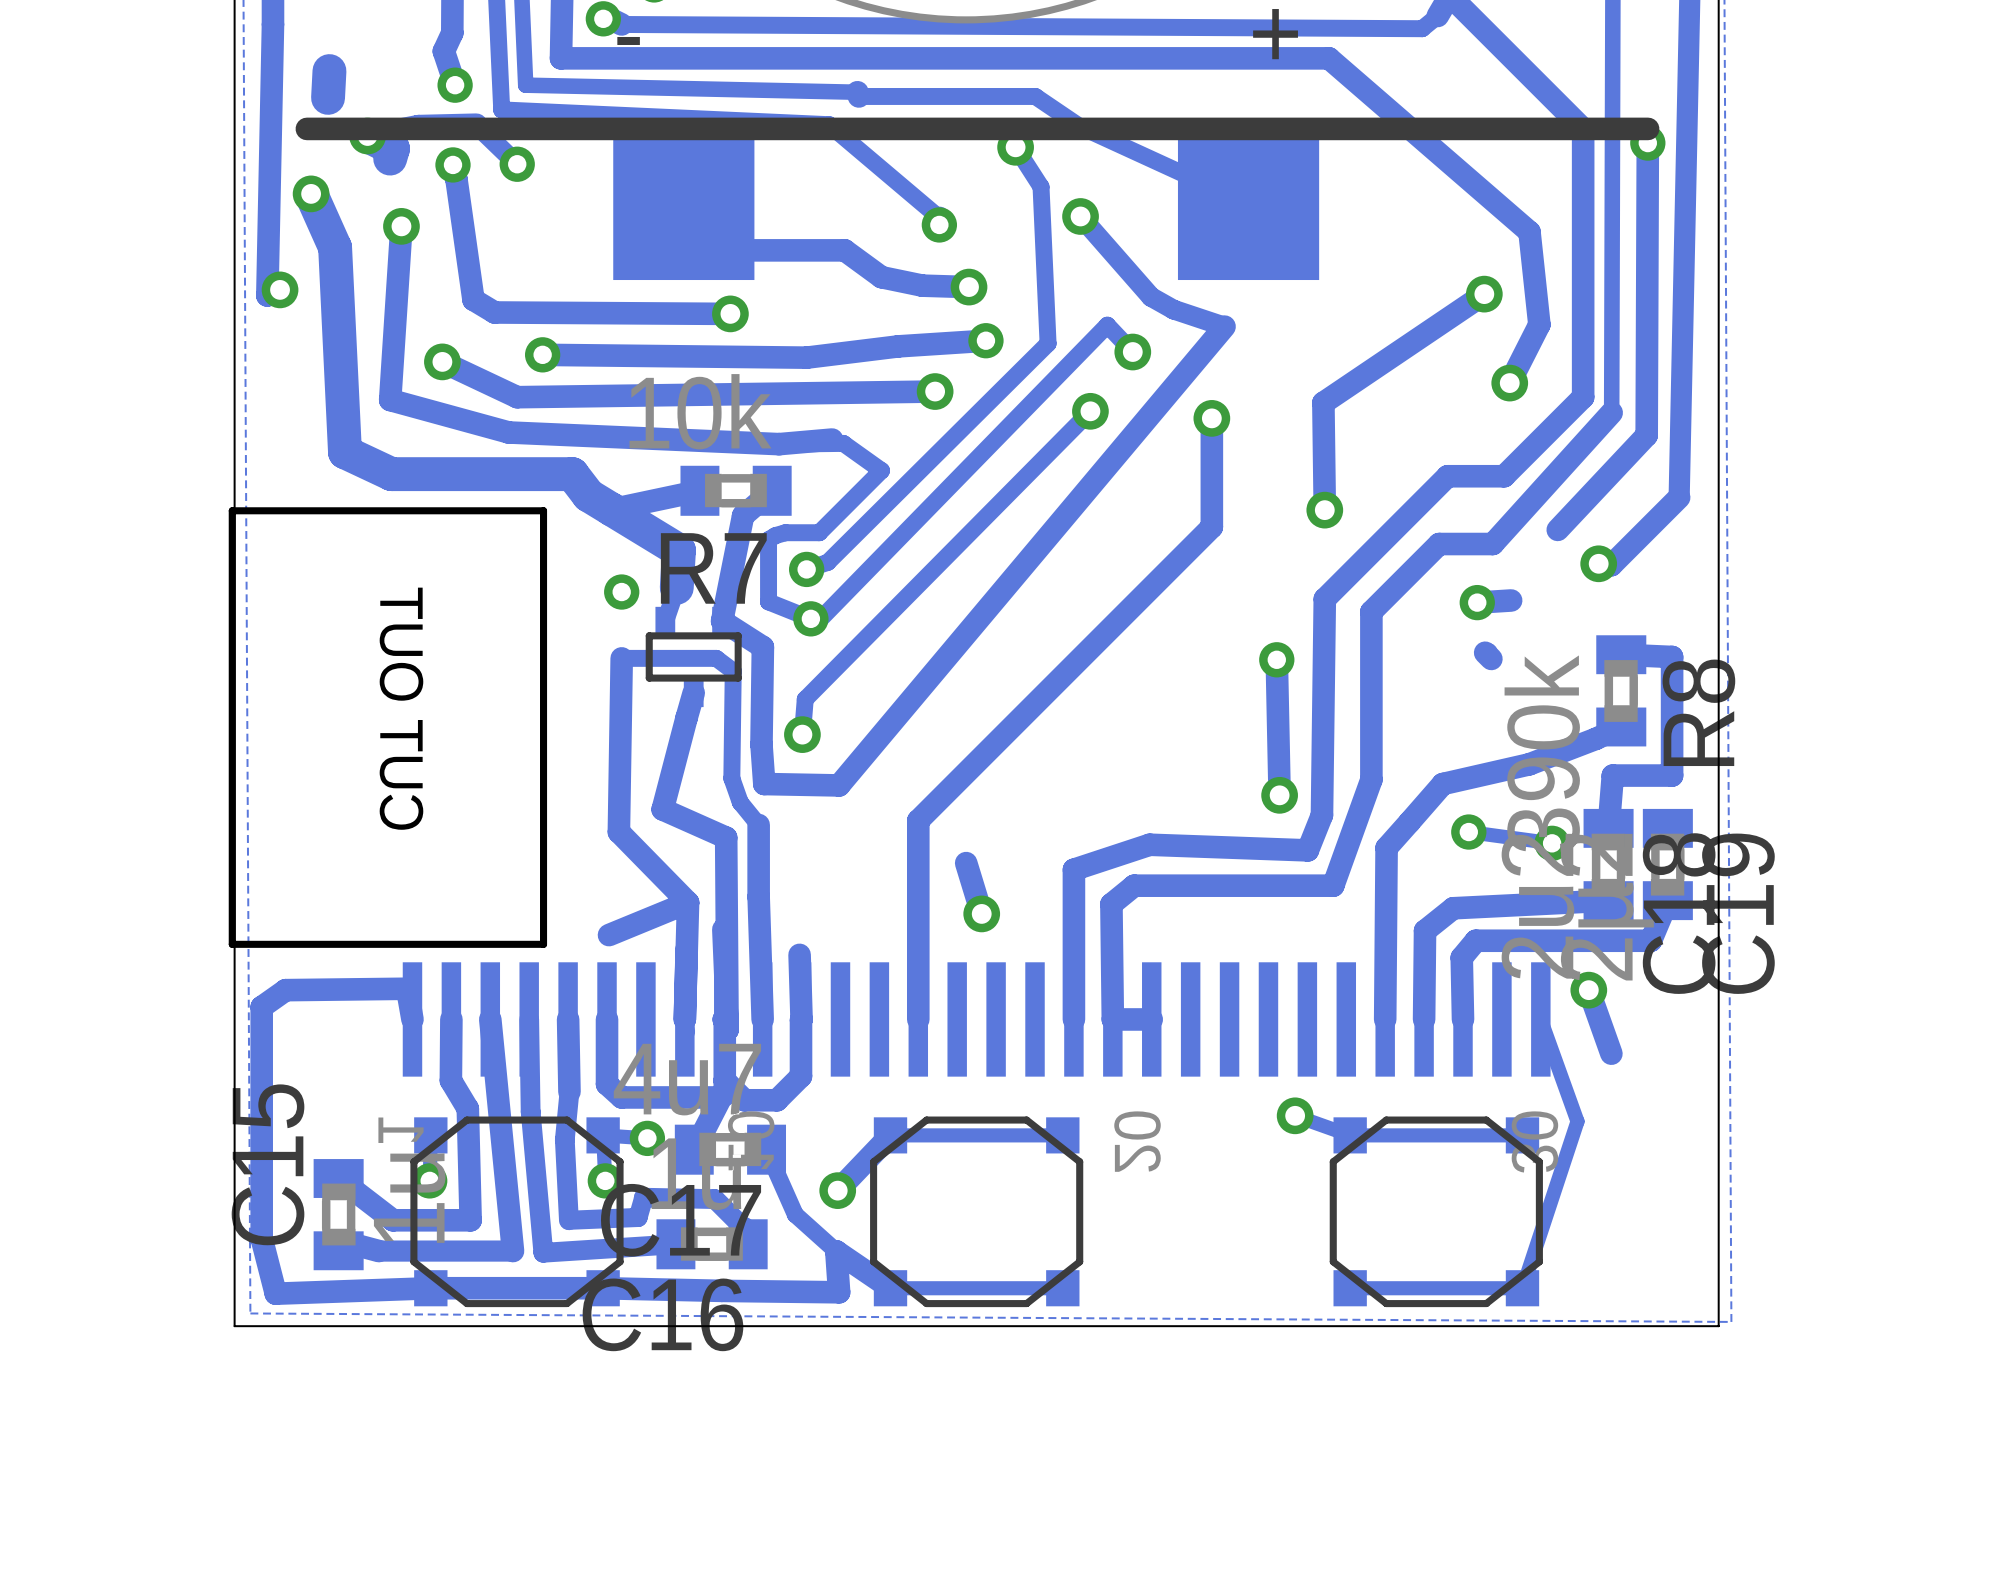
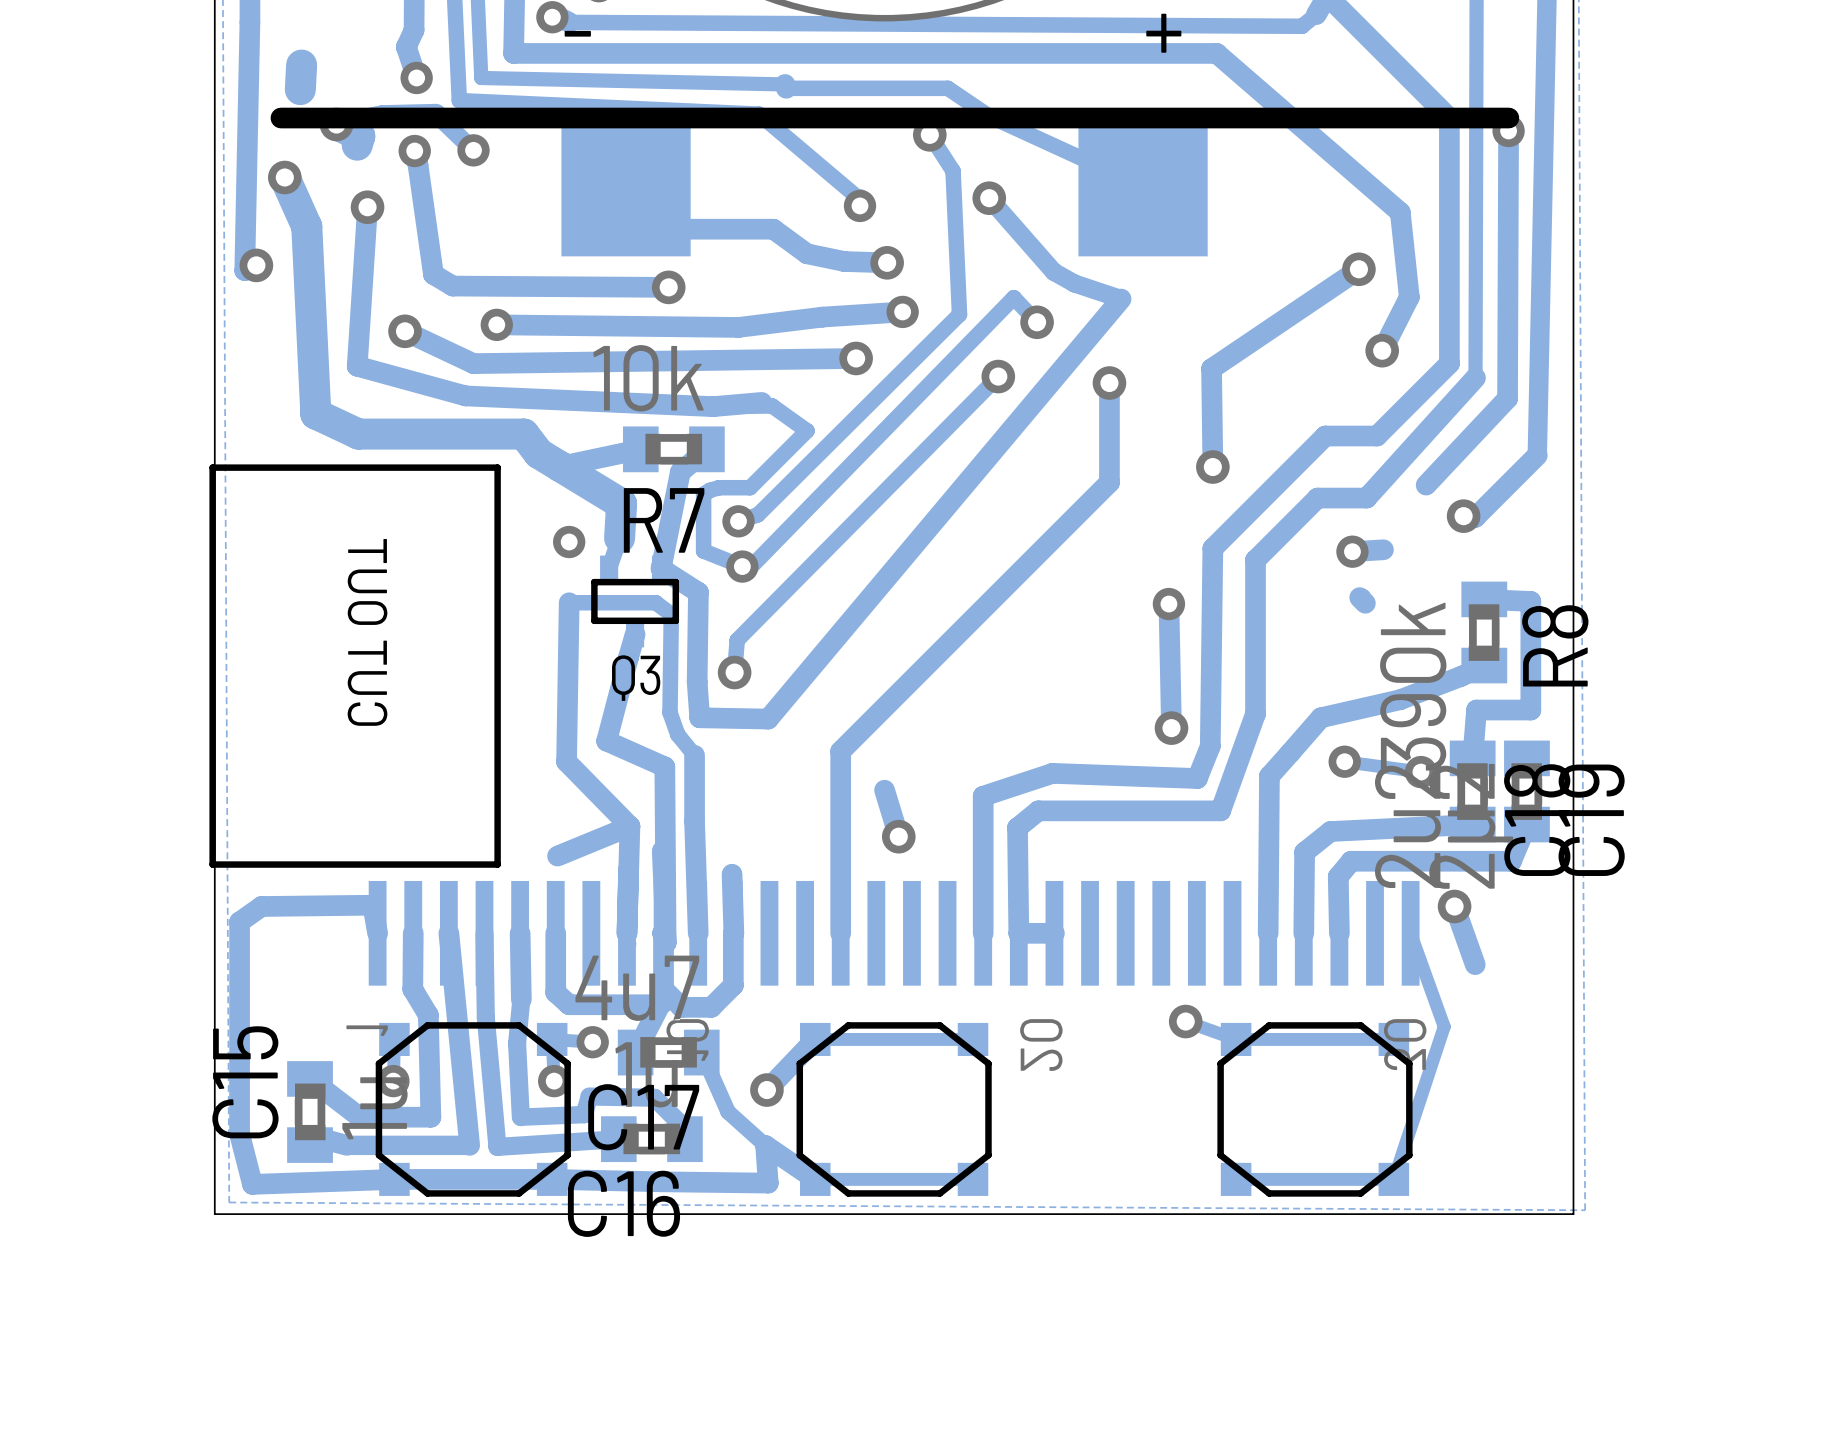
Q3 name: none -> Q3 (636, 678)

